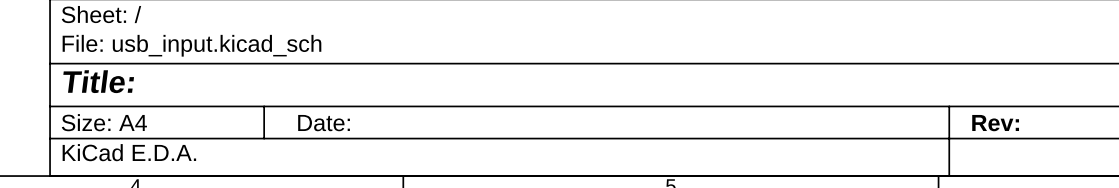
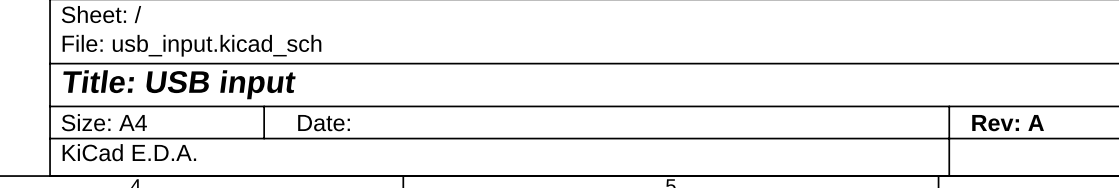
title block: Title: (98, 81) -> Title: USB input (179, 84)
title block: Rev: (995, 123) -> Rev: A (1008, 123)

